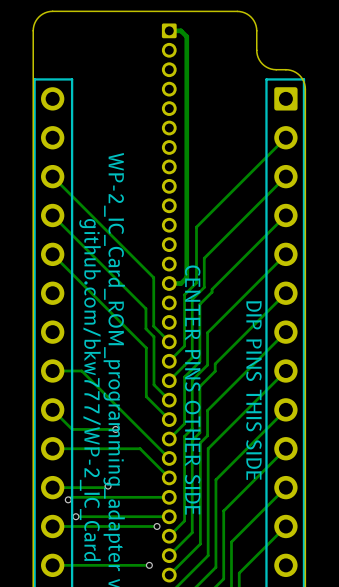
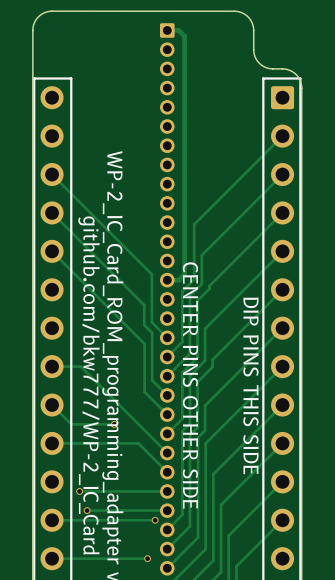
track: (108, 486) (52, 487) -> none
via: (108, 486) -> none
track: (80, 497) (70, 497) (68, 499) -> none
via: none -> (79, 491)
via: (68, 499) -> none
via: (75, 516) -> none
track: (88, 516) (75, 516) -> none
via: none -> (87, 510)

